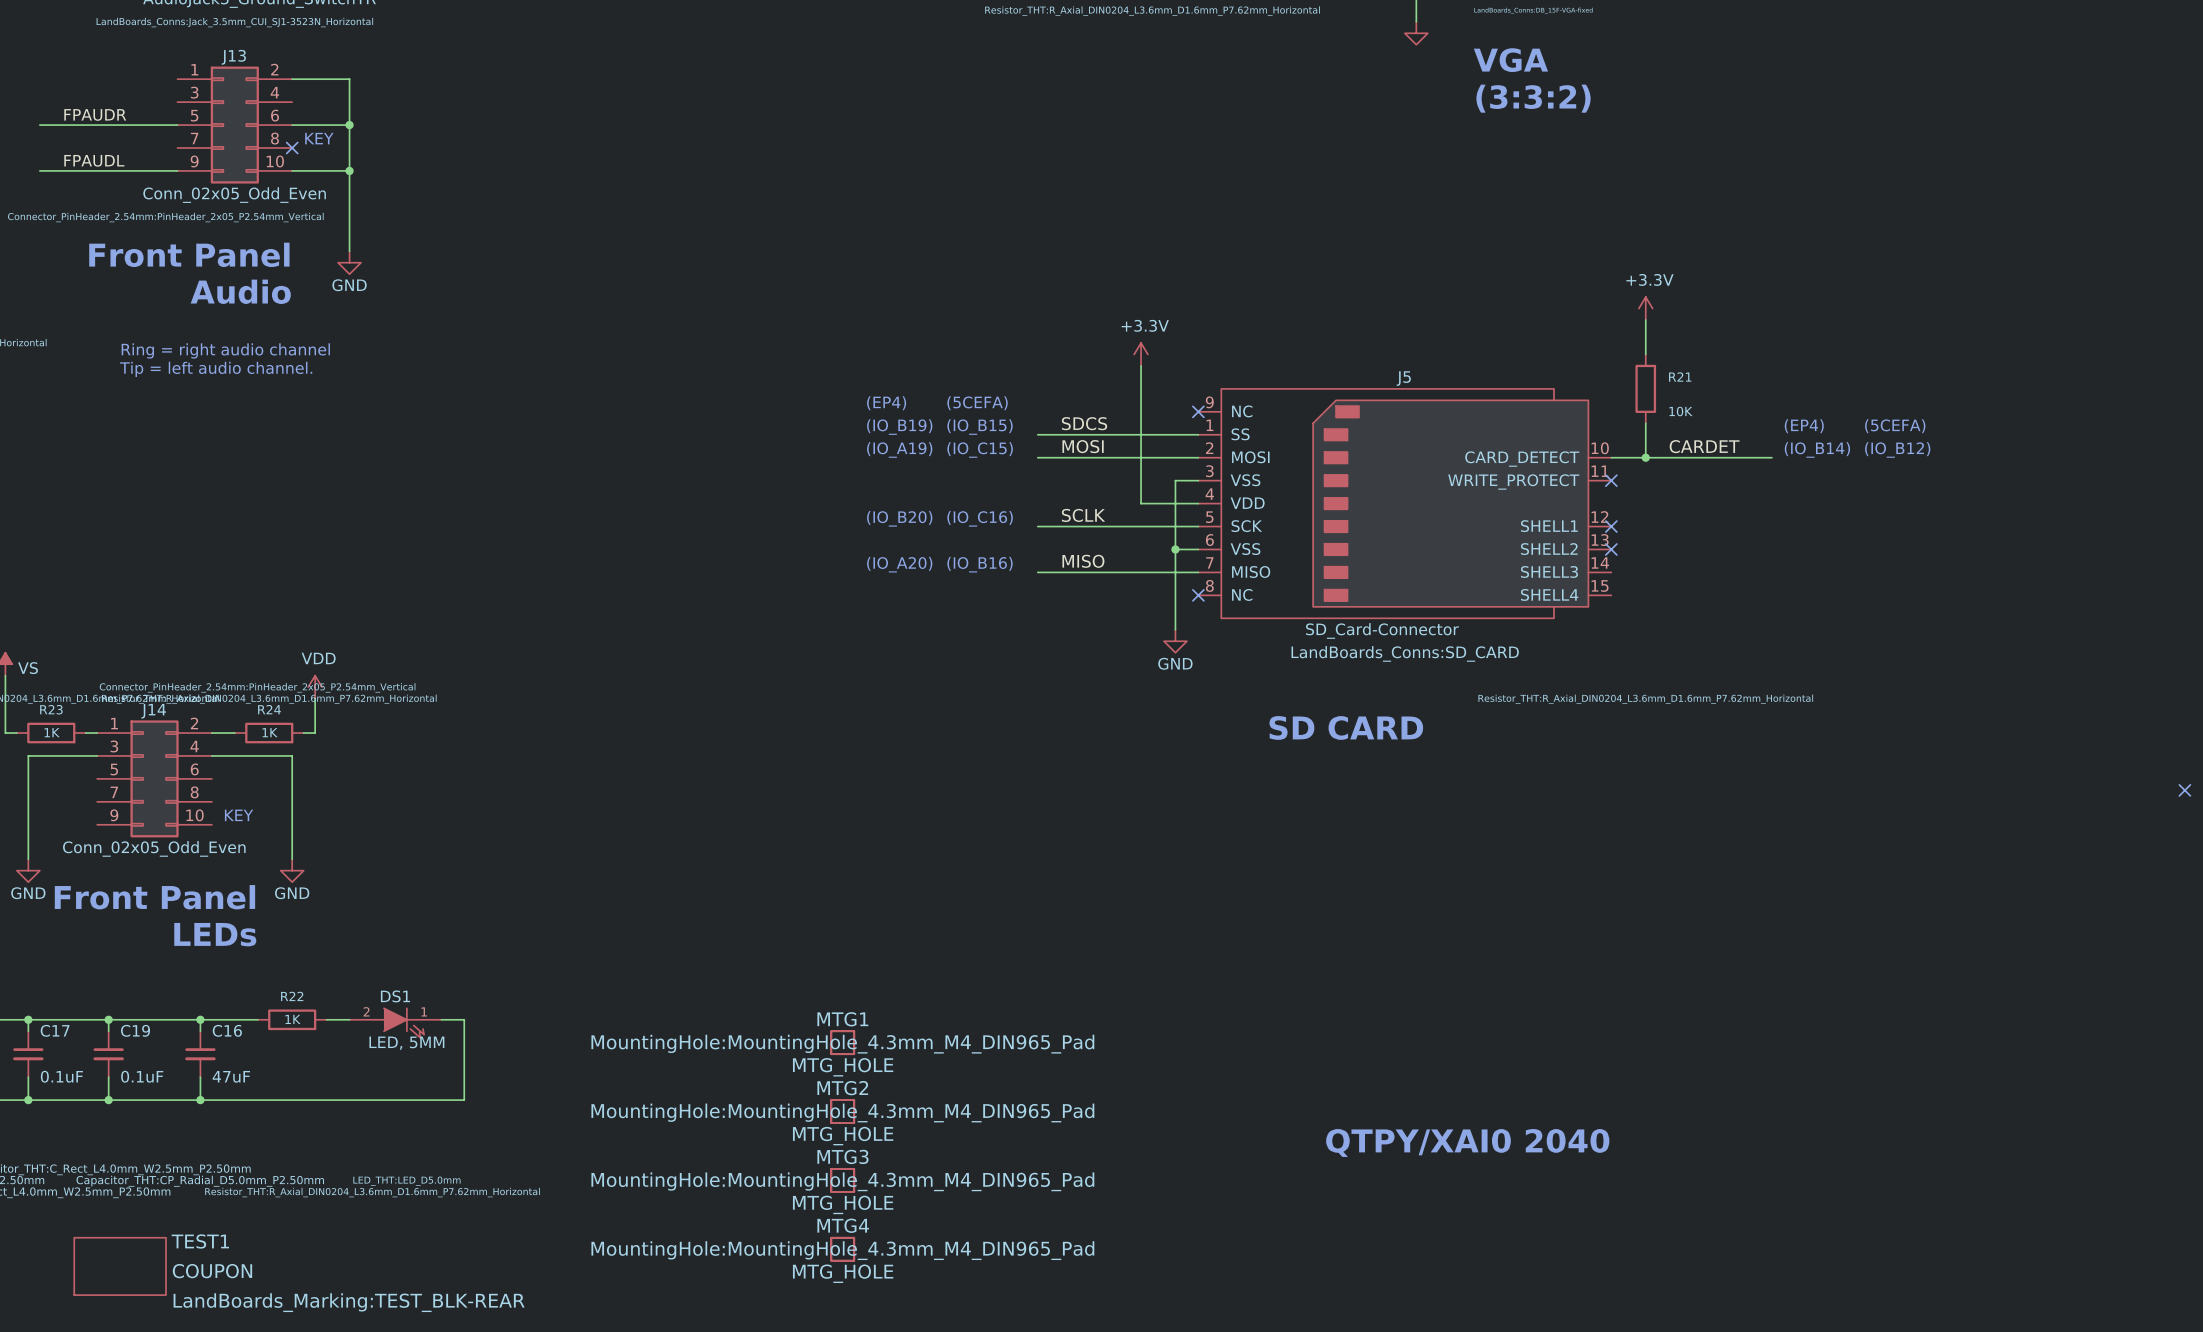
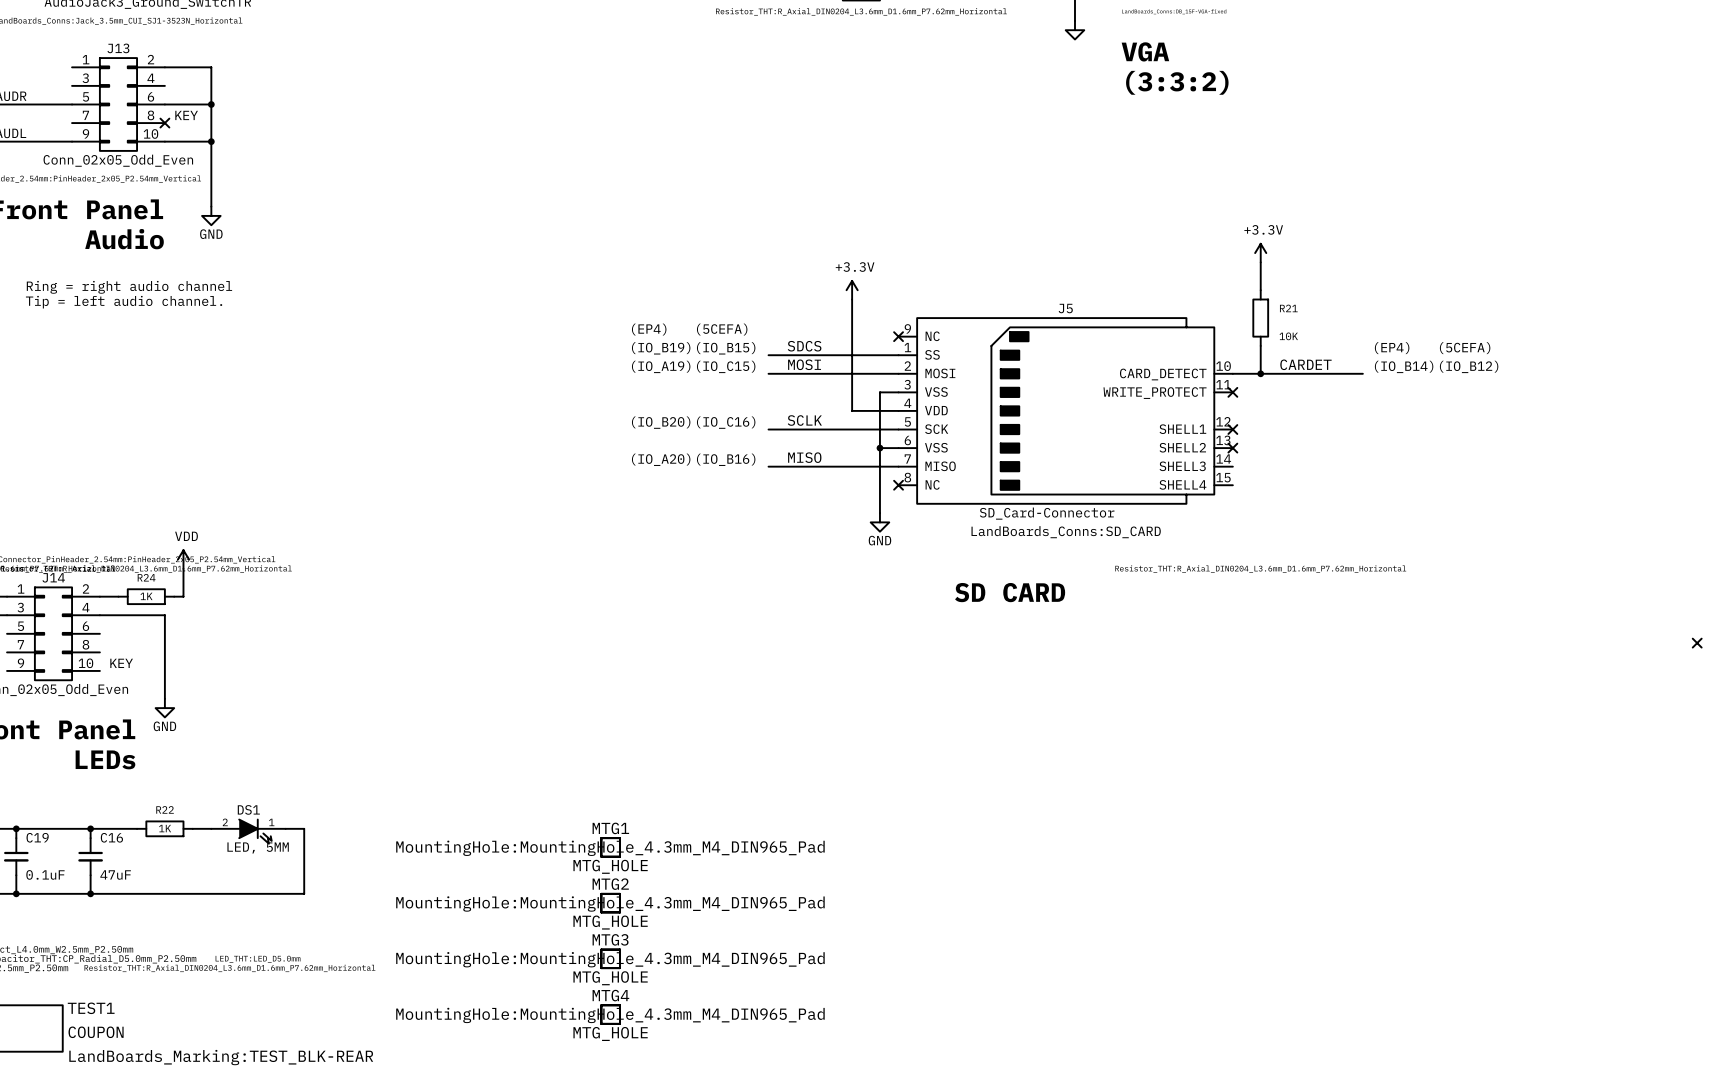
text: QTPY/XAI0 2040 (1467, 1142) -> none

